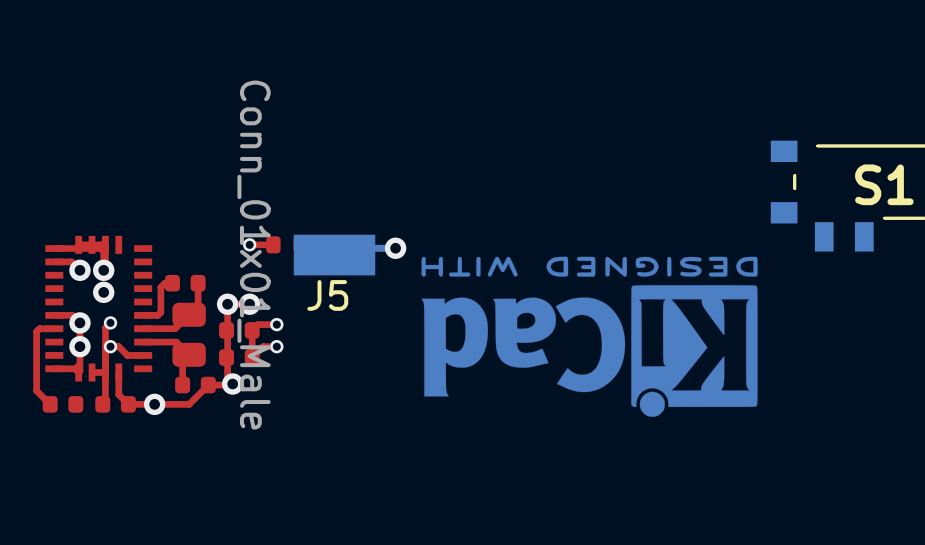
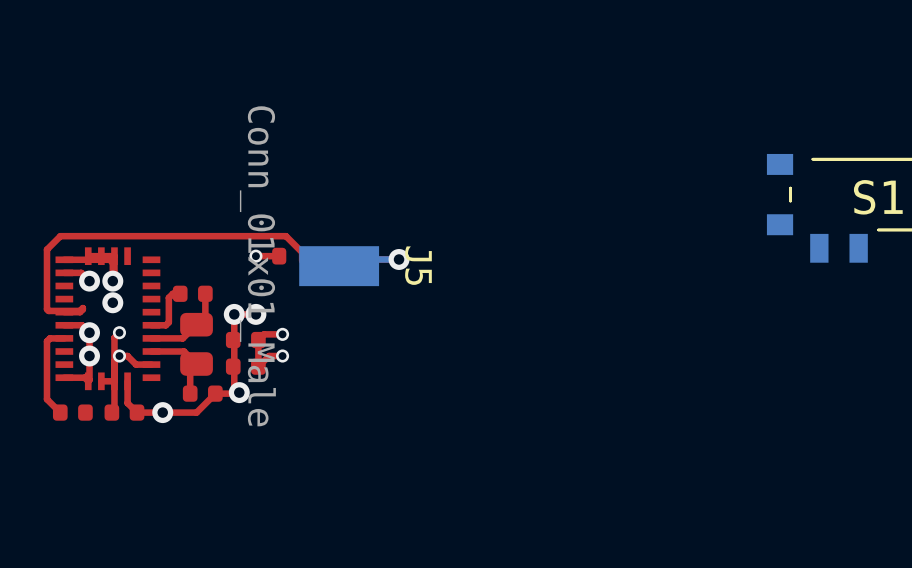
top track: none -> (305, 256) (285, 236) (60, 236) (46, 249) (46, 309) (48, 310) (80, 310) (82, 308) (80, 312) (64, 312)
drawing: [421, 256, 758, 417] -> none
J5 name rotation: 0° (327, 295) -> 90° clockwise (418, 265)
J5 name position: J5 (327, 295) -> J5 (418, 265)

